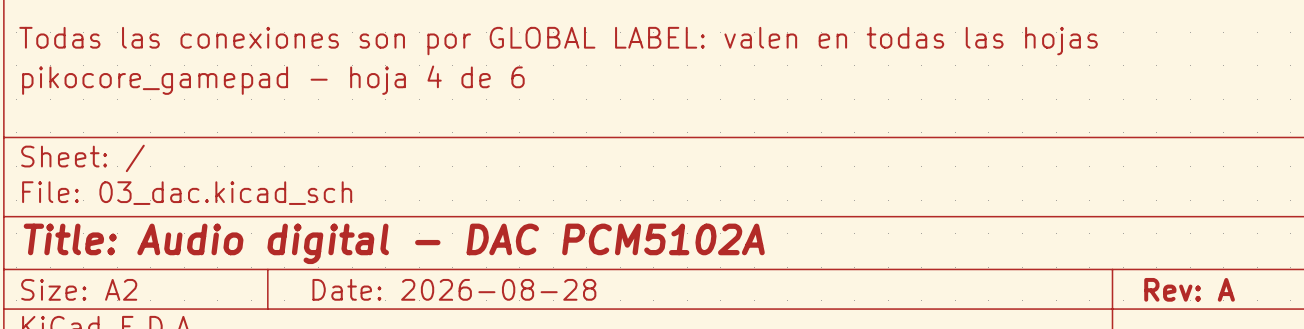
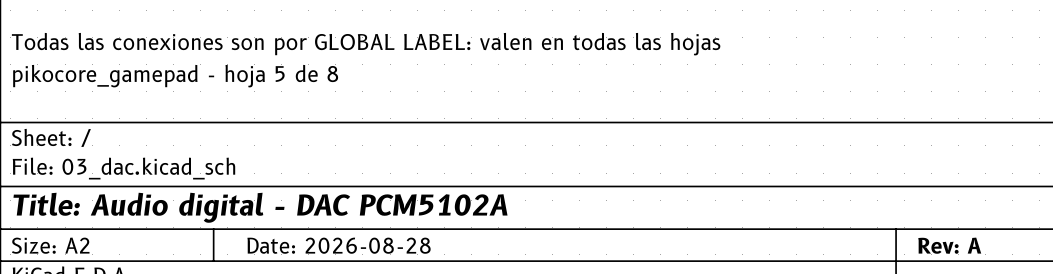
title block: pikocore_gamepad - hoja 4 de 6 (273, 80) -> pikocore_gamepad - hoja 5 de 8 (175, 76)

